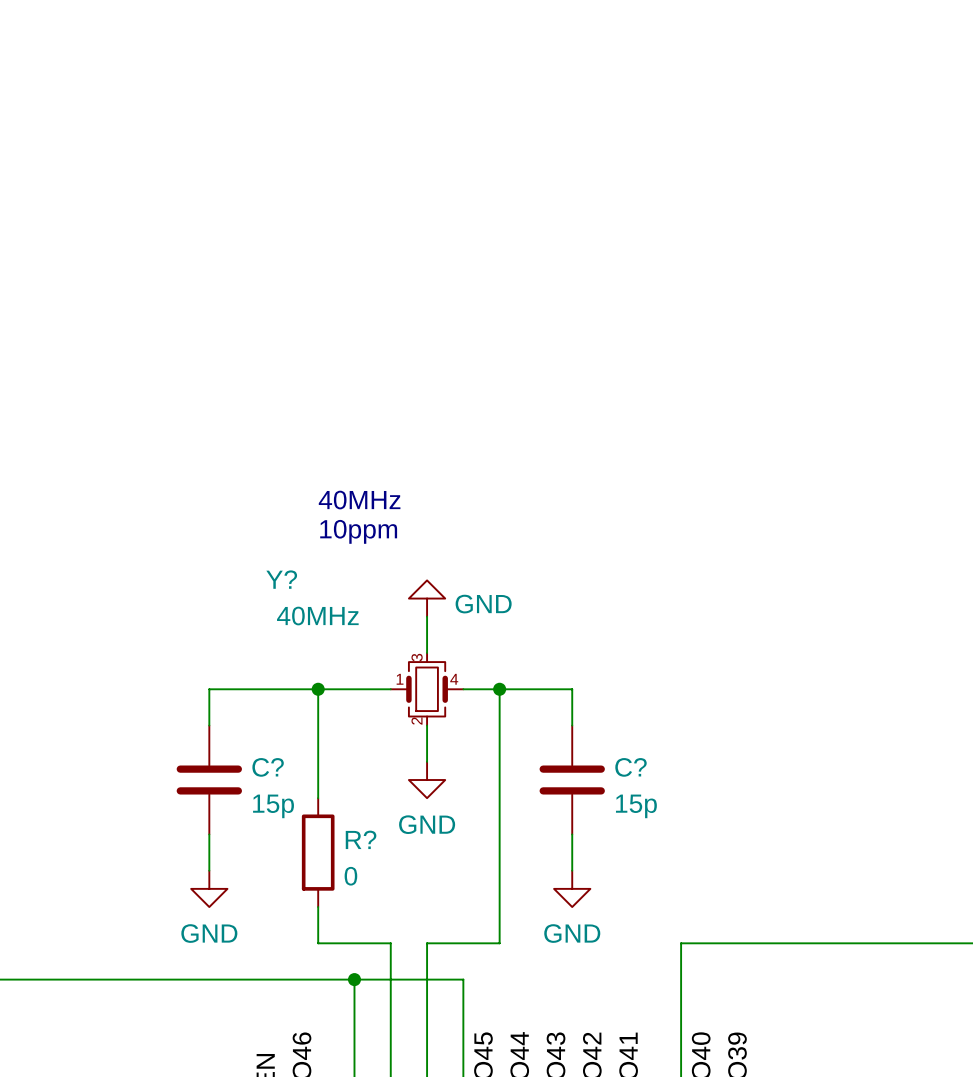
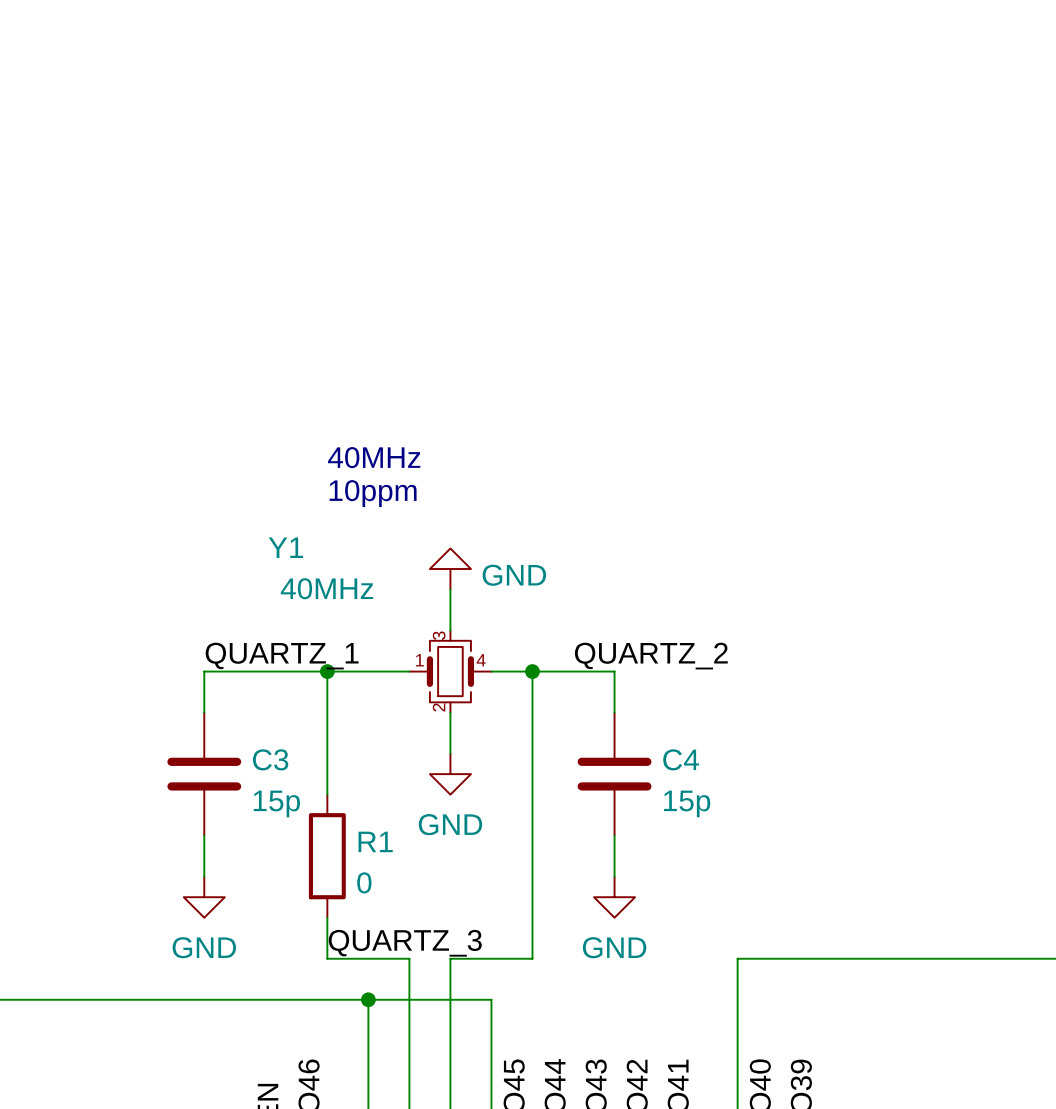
Y? name: Y? (281, 579) -> Y1 (285, 547)
label: none -> QUARTZ_1 (282, 656)
label: none -> QUARTZ_2 (651, 656)
C? name: C? (268, 767) -> C3 (270, 759)
C? name: C? (631, 767) -> C4 (681, 759)
R? name: R? (361, 839) -> R1 (375, 841)
label: none -> QUARTZ_3 (405, 943)

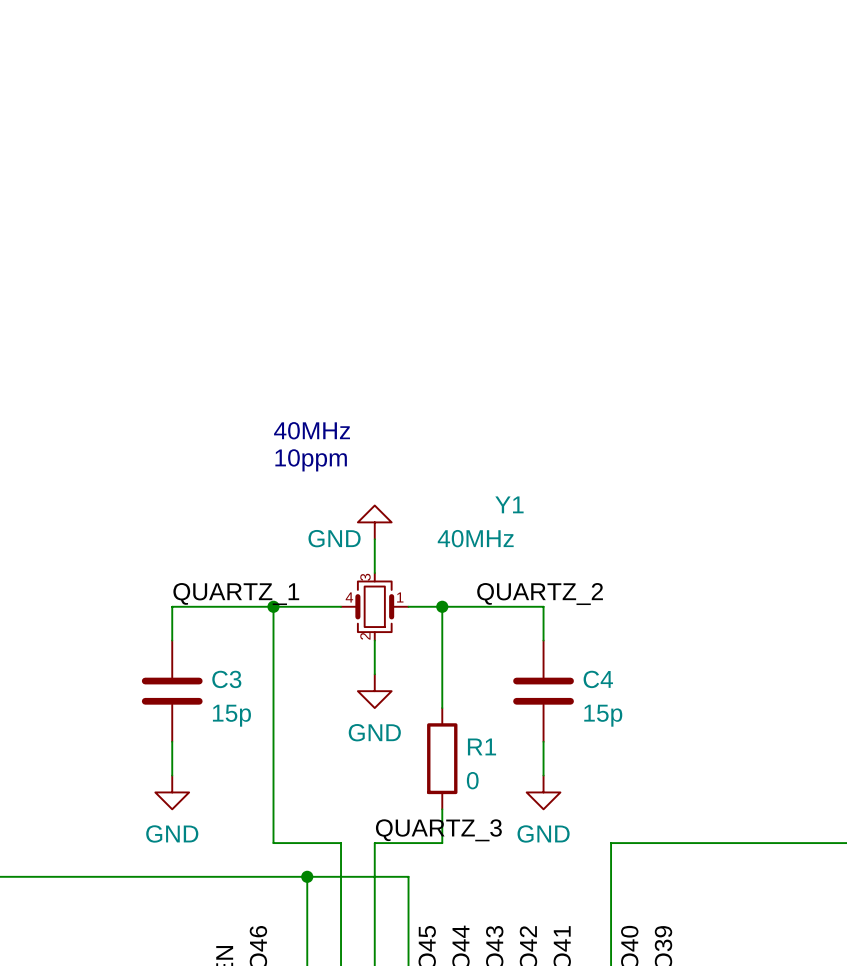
power symbol text position: GND (514, 575) -> GND (334, 538)
Y1 flip: as is (450, 671) -> left-right (374, 606)
wire: (614, 671) (614, 712) -> (509, 606) (543, 606) (543, 640)
C4 position: (614, 774) -> (543, 691)
wire: (532, 794) (532, 917) -> (273, 708) (273, 809)
wire: (614, 835) (614, 876) -> (543, 741) (543, 775)
R1 position: (327, 856) -> (442, 758)
power symbol position: GND (614, 897) -> GND (543, 792)
label position: QUARTZ_3 (405, 943) -> QUARTZ_3 (438, 830)

